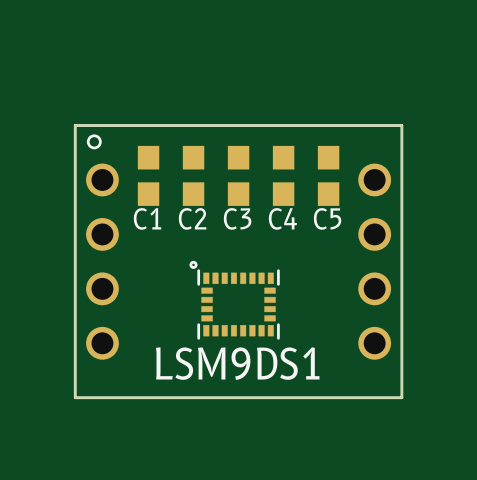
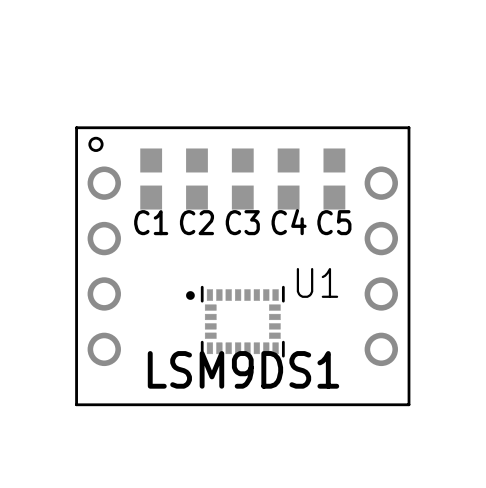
part: (234, 300) -> none
U1: none -> (235, 321)

